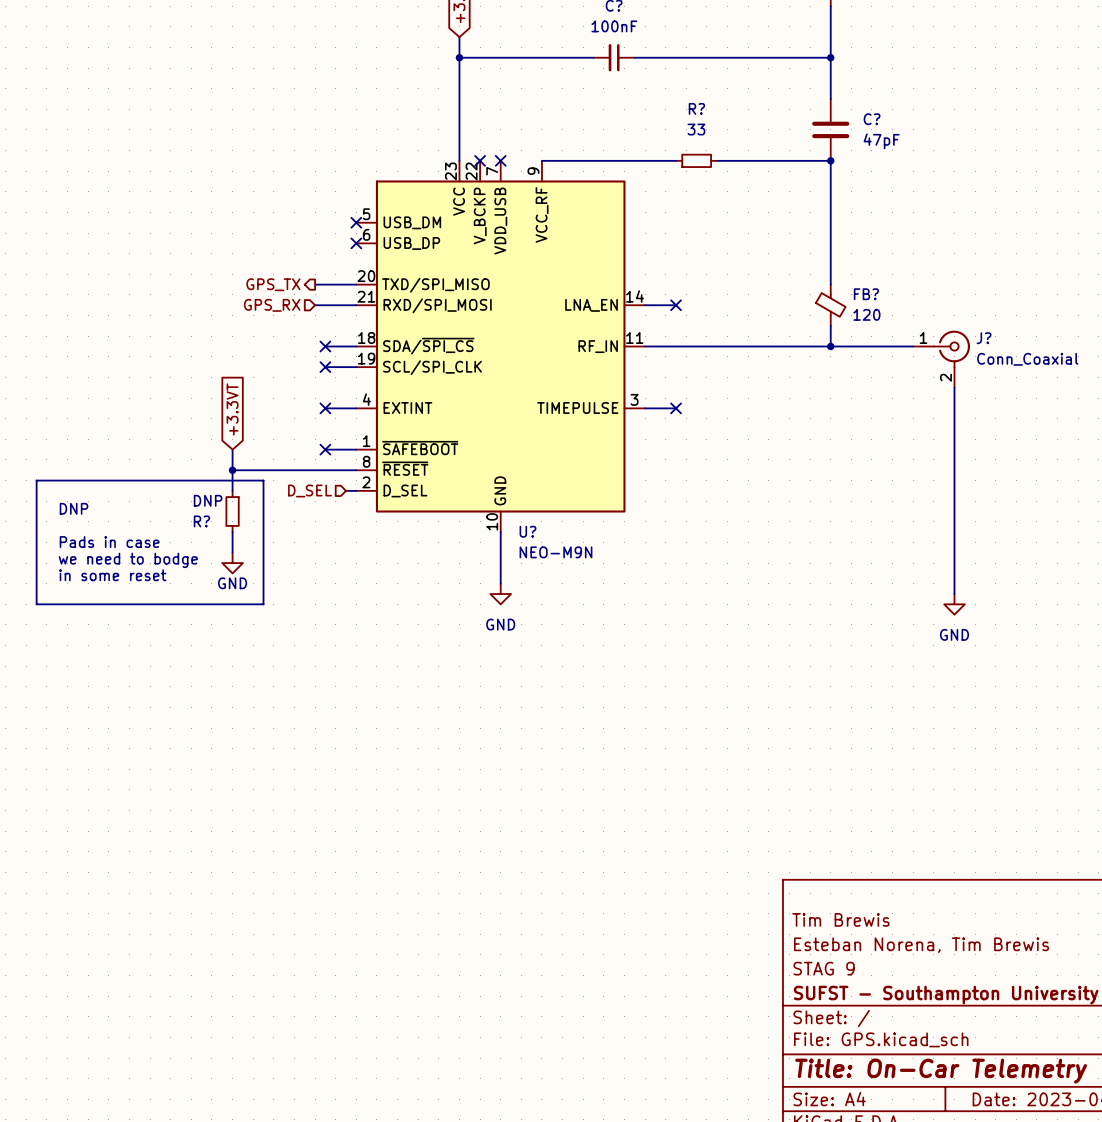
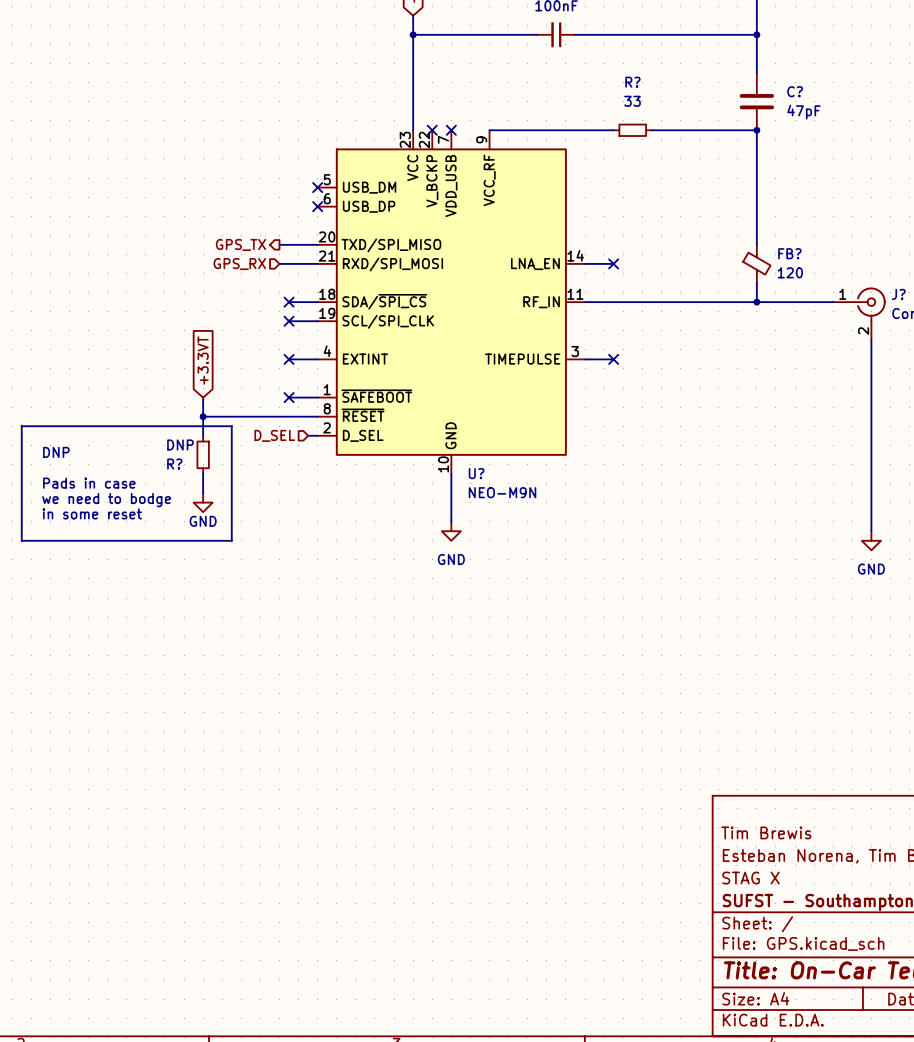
title block: STAG 9 (824, 968) -> STAG X (750, 878)

